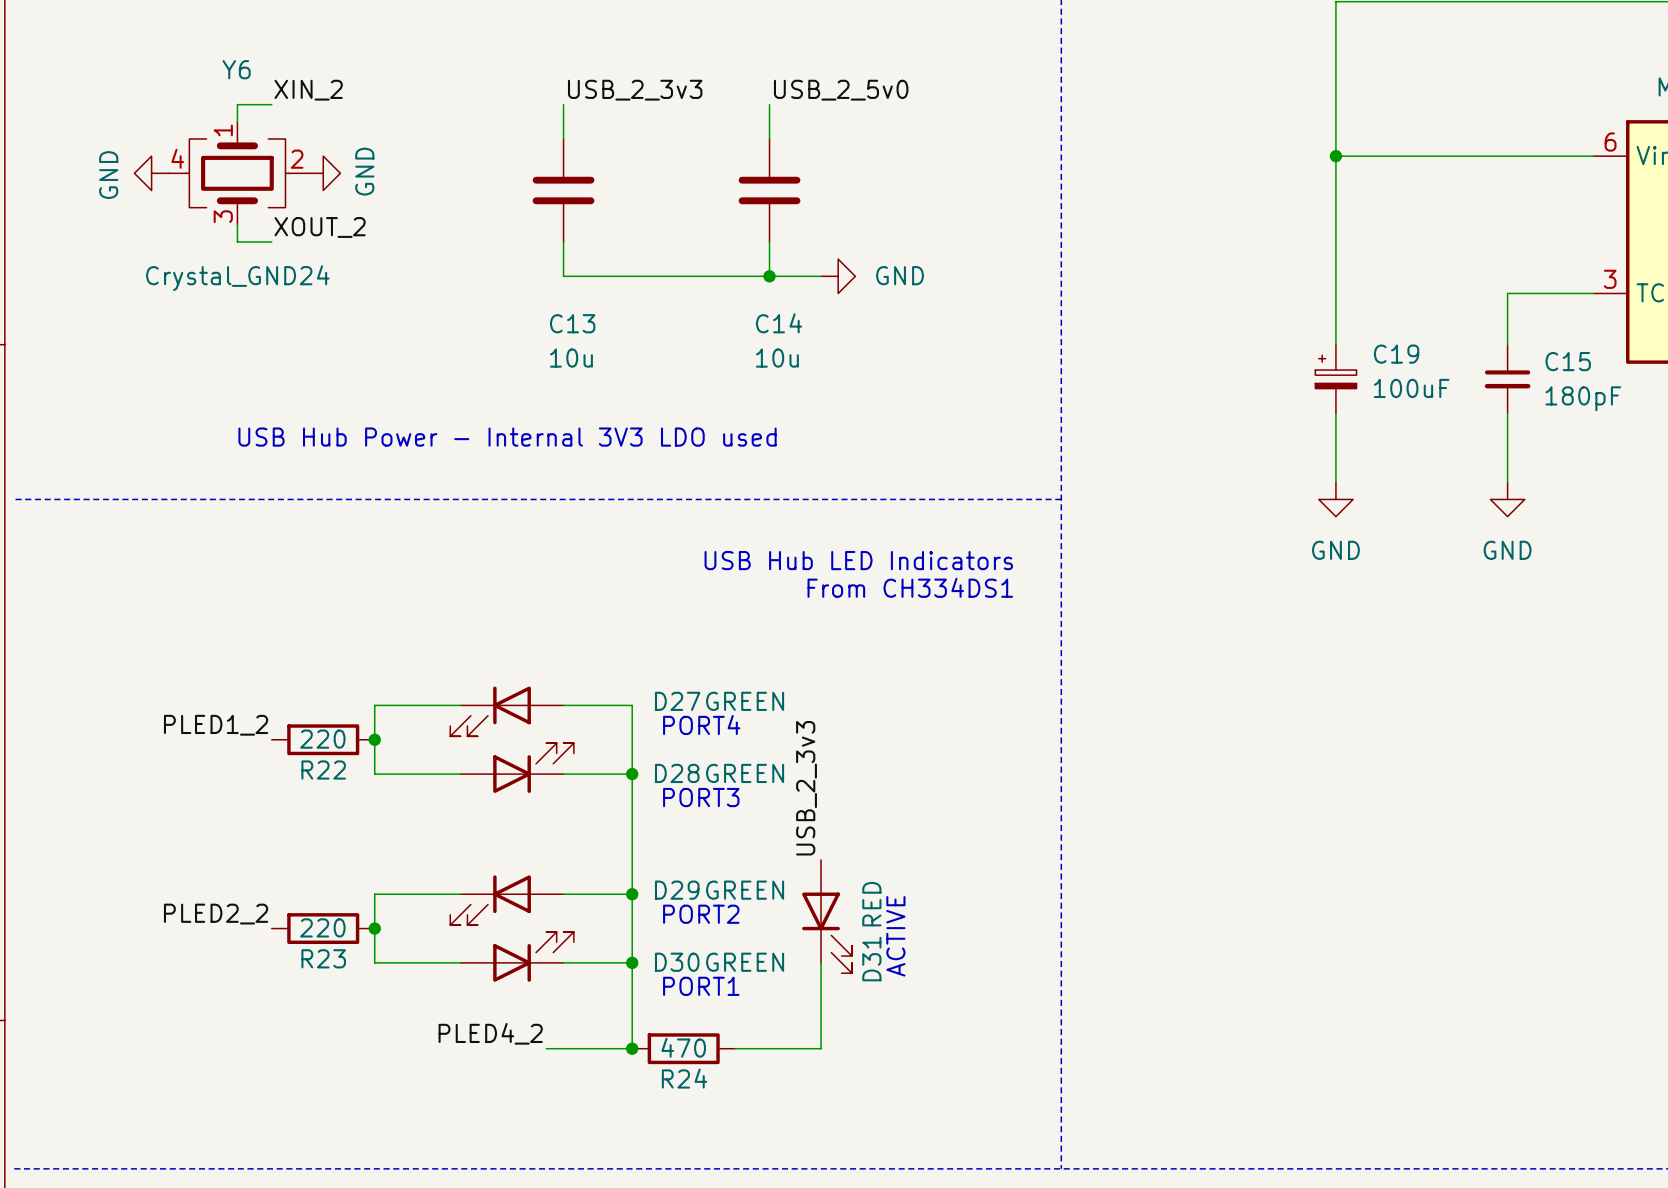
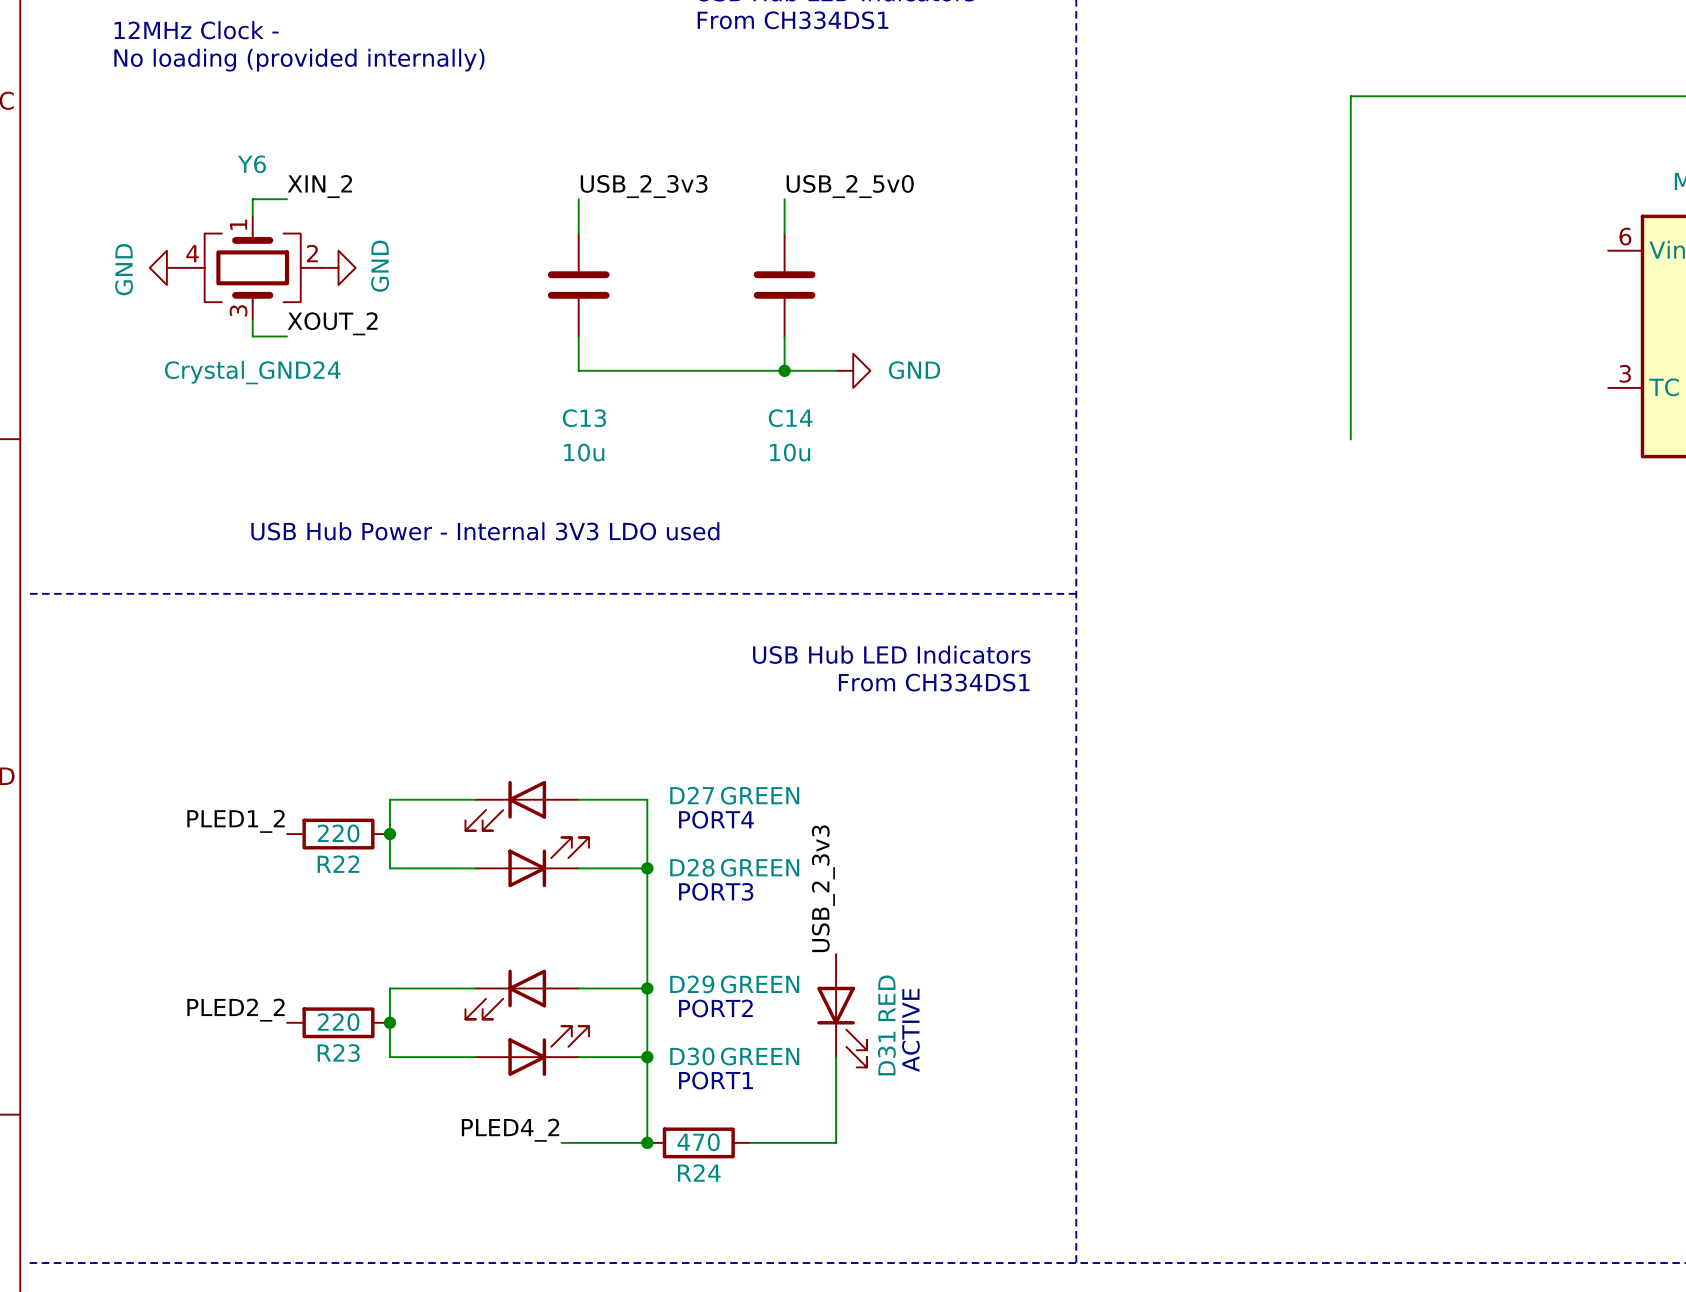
wire: (1335, 156) (1593, 156) -> none
junction: (1335, 156) -> none
wire: (1593, 293) (1507, 293) (1507, 344) -> none
C19: 100uF (1335, 379) -> none
C15: 180pF (1507, 379) -> none
wire: (1335, 413) (1335, 482) -> none
wire: (1507, 413) (1507, 482) -> none
power symbol: GND (1335, 499) -> none
power symbol: GND (1507, 499) -> none

